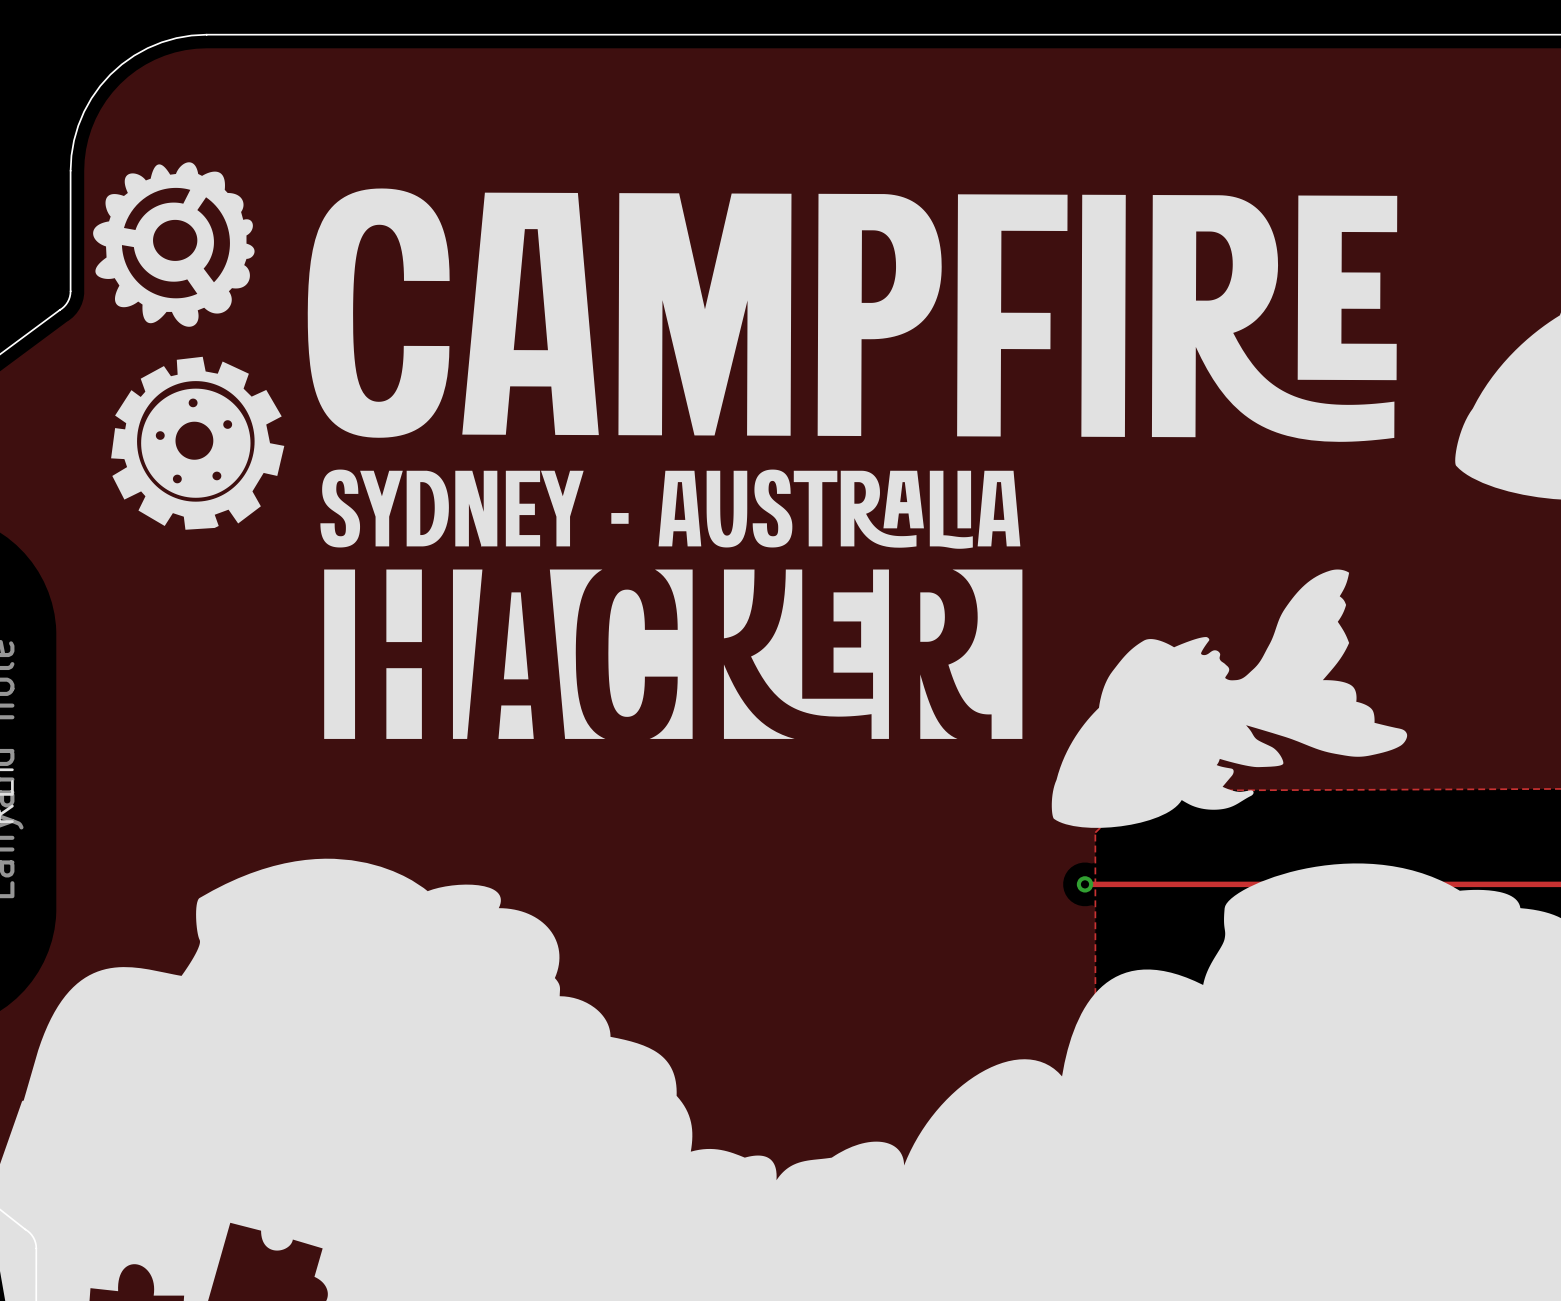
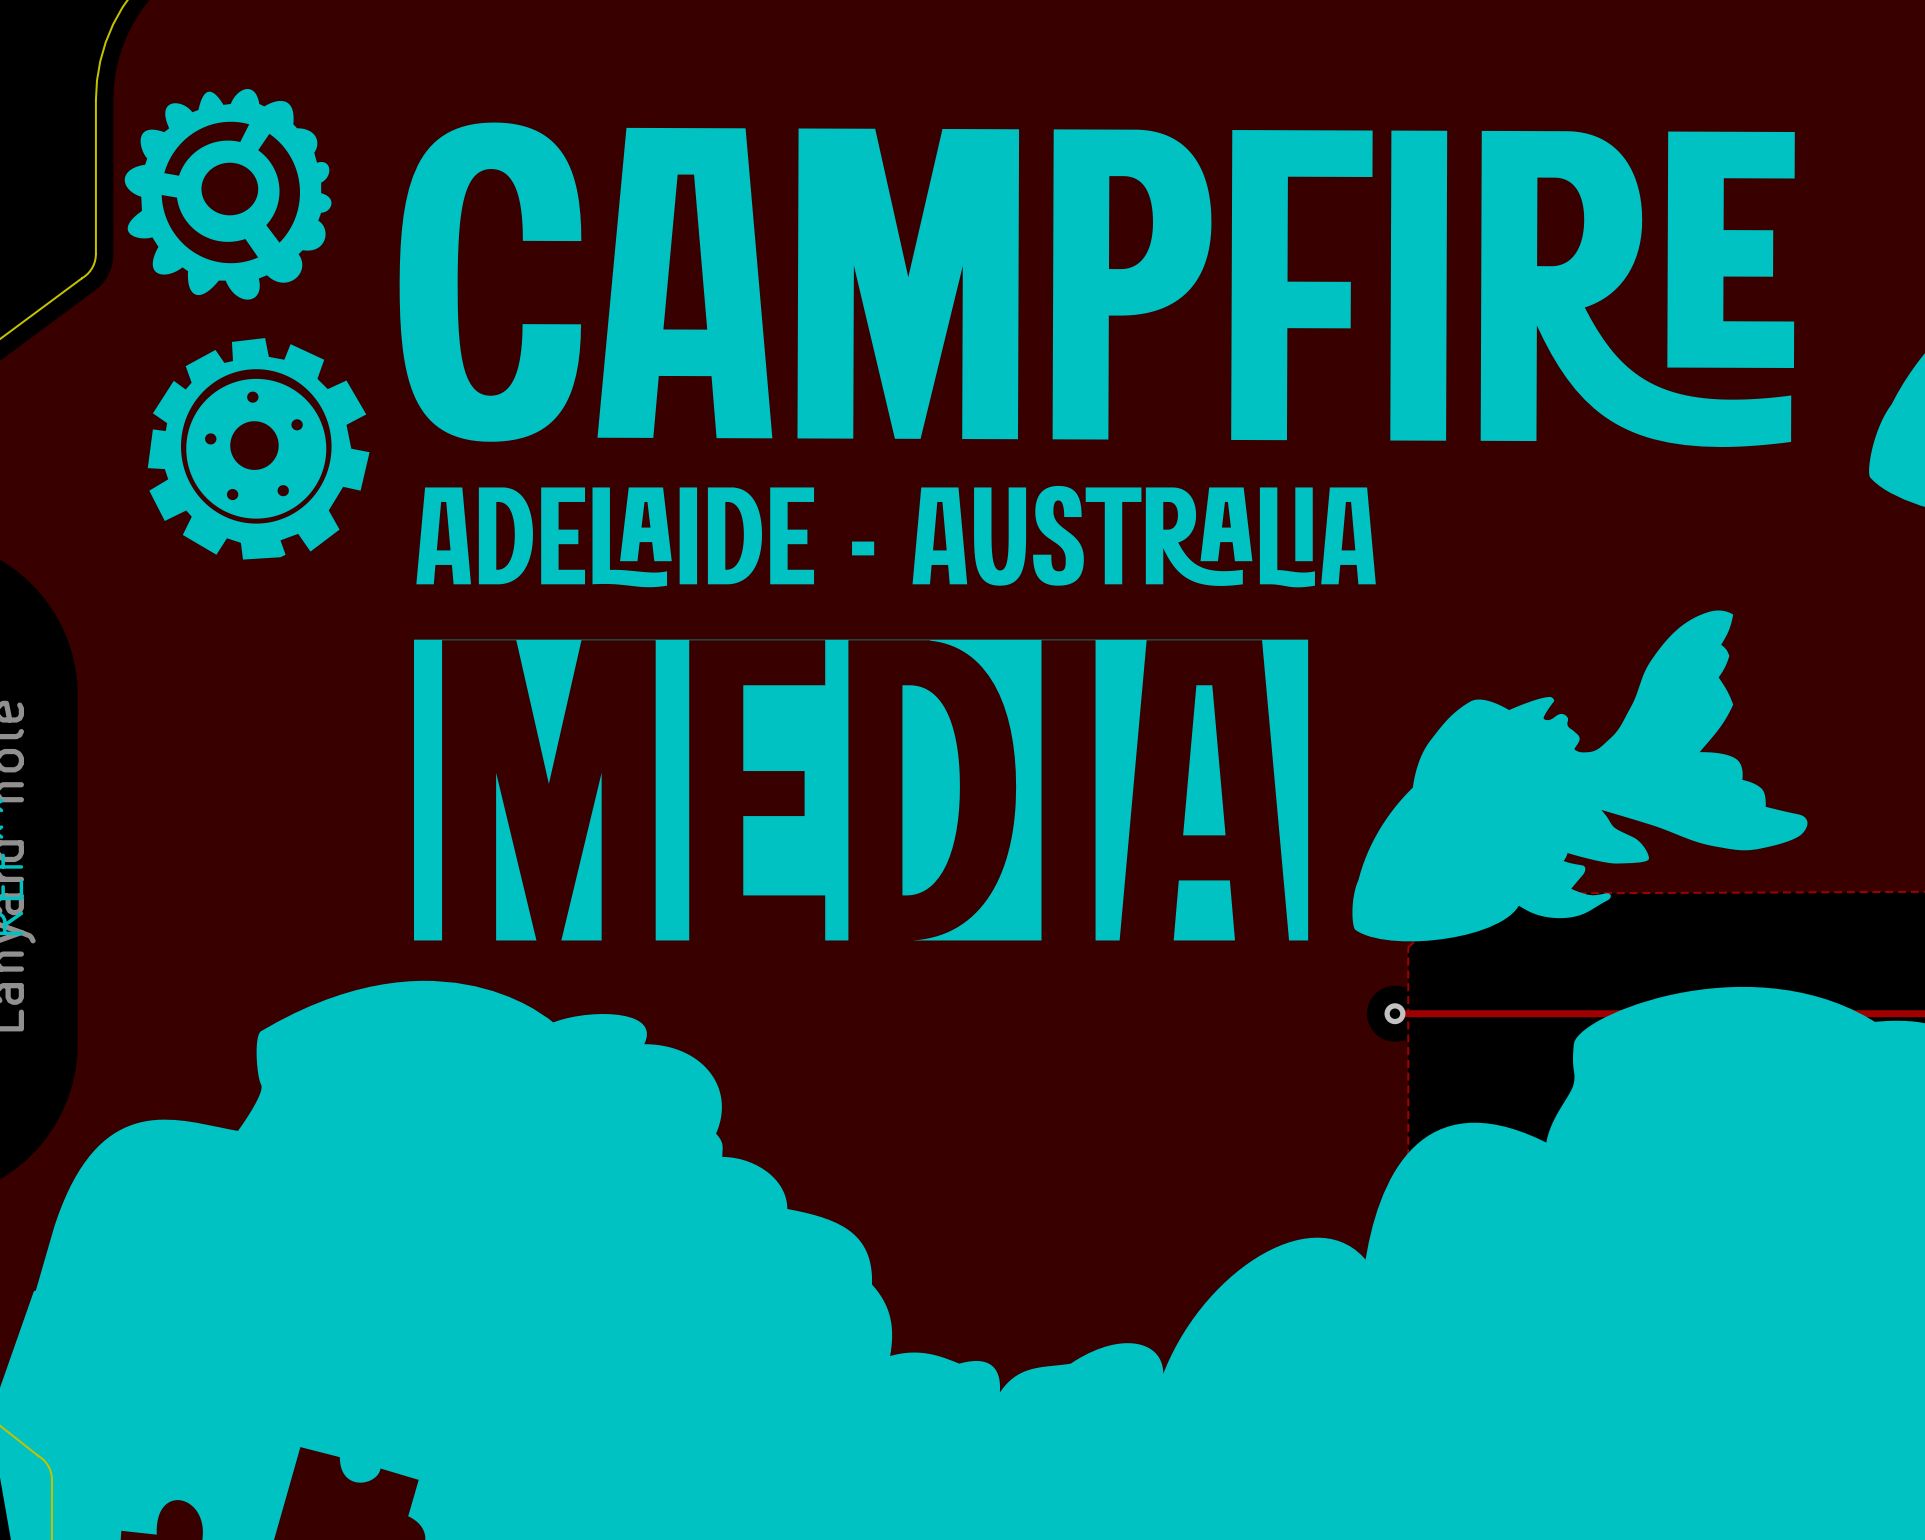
drawing shape: [320, 469, 361, 548] -> [416, 487, 472, 585]
drawing: [324, 470, 1023, 739] -> none
drawing shape: [455, 470, 498, 547] -> [592, 487, 668, 588]
drawing shape: [505, 470, 541, 547] -> [679, 487, 698, 585]
drawing shape: [540, 470, 584, 547] -> [707, 487, 763, 585]
drawing: none -> [541, 487, 672, 585]
drawing: none -> [770, 487, 815, 585]
drawing position: (903, 499) -> (1226, 524)
drawing position: (964, 499) -> (1304, 524)
drawing position: (427, 508) -> (505, 535)
drawing position: (679, 508) -> (939, 535)
drawing position: (772, 508) -> (1058, 535)
drawing position: (815, 508) -> (1113, 535)
drawing position: (999, 508) -> (1348, 535)
drawing position: (726, 509) -> (1000, 536)
drawing position: (878, 509) -> (1194, 536)
drawing position: (951, 509) -> (1287, 537)
drawing position: (619, 518) -> (863, 548)
drawing: none -> [414, 639, 1309, 941]
drawing shape: [920, 674, 958, 739] -> [1183, 685, 1226, 836]

